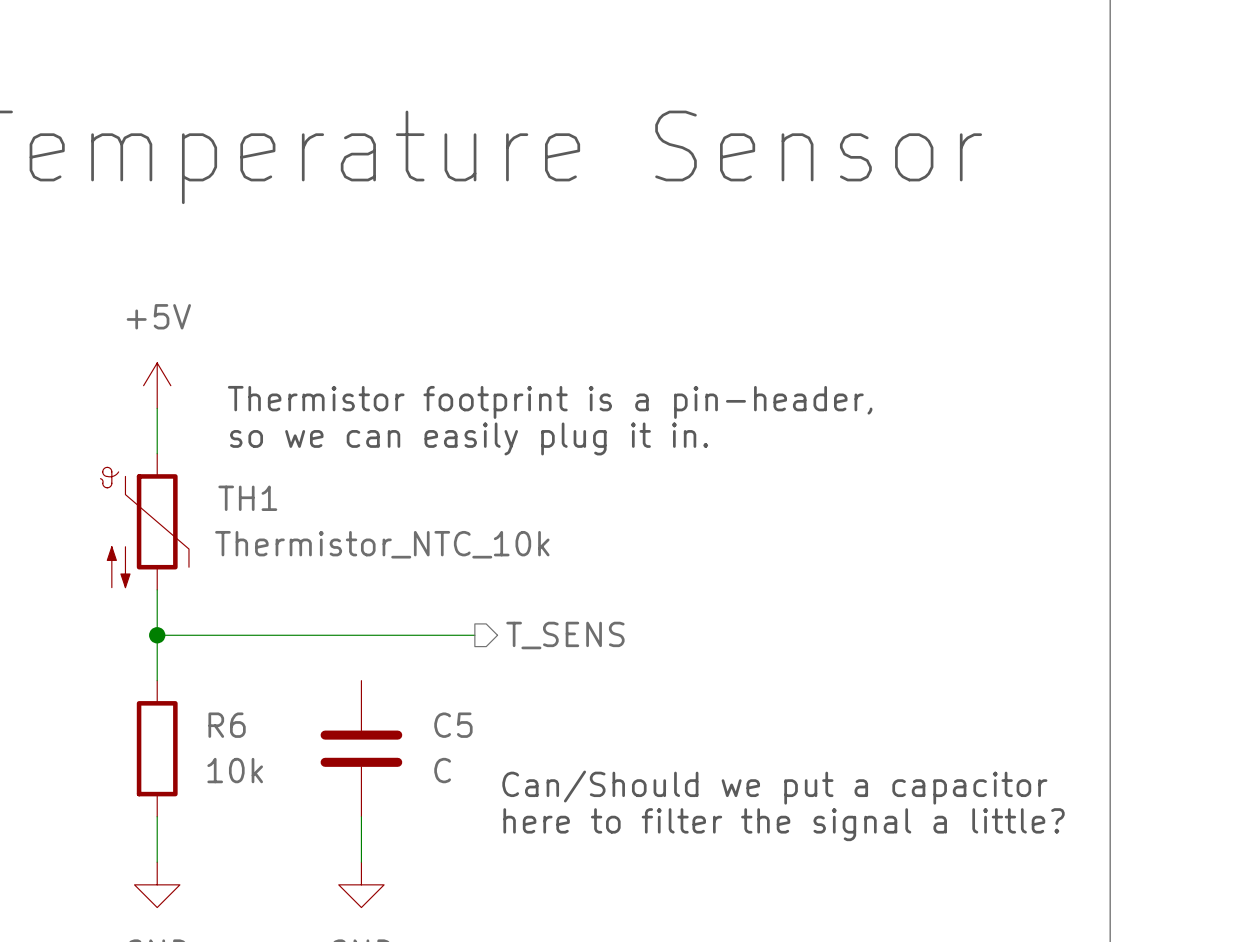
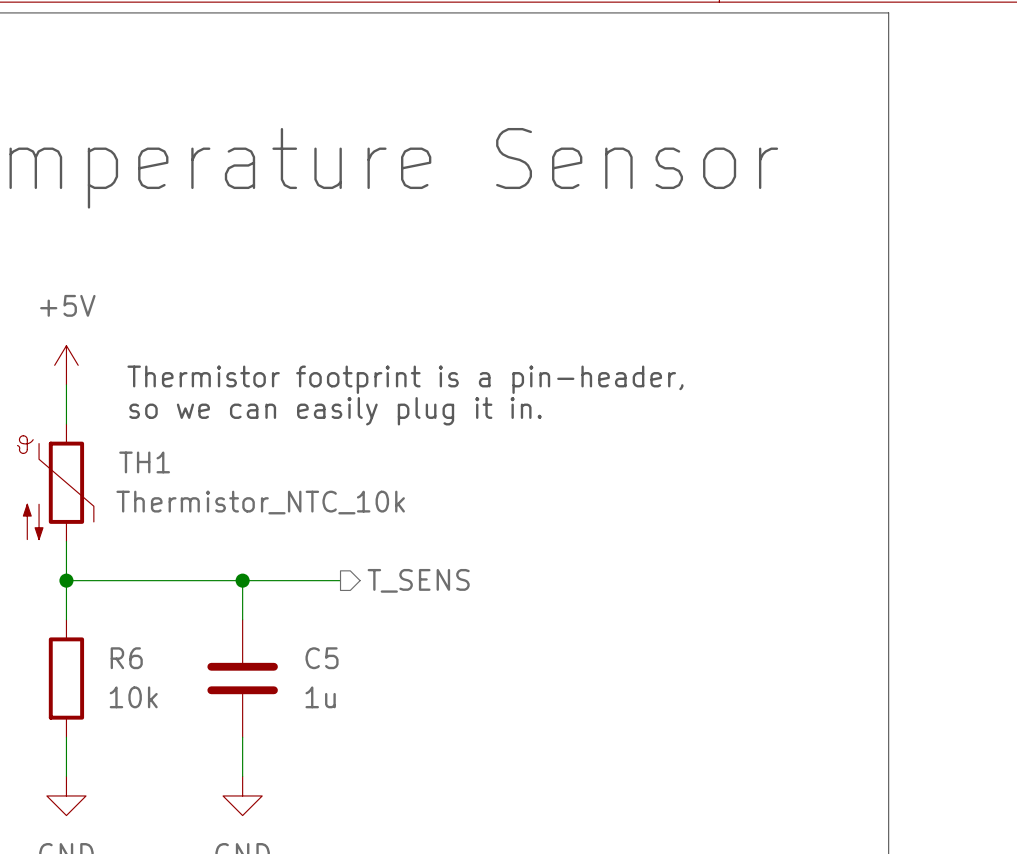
wire: none -> (242, 580) (242, 619)
junction: none -> (242, 580)
C5 value: C (442, 770) -> 1u (320, 697)
text: Can/Should we put a capacitor (774, 787) -> none
text: here to filter the signal a little? (784, 824) -> none

